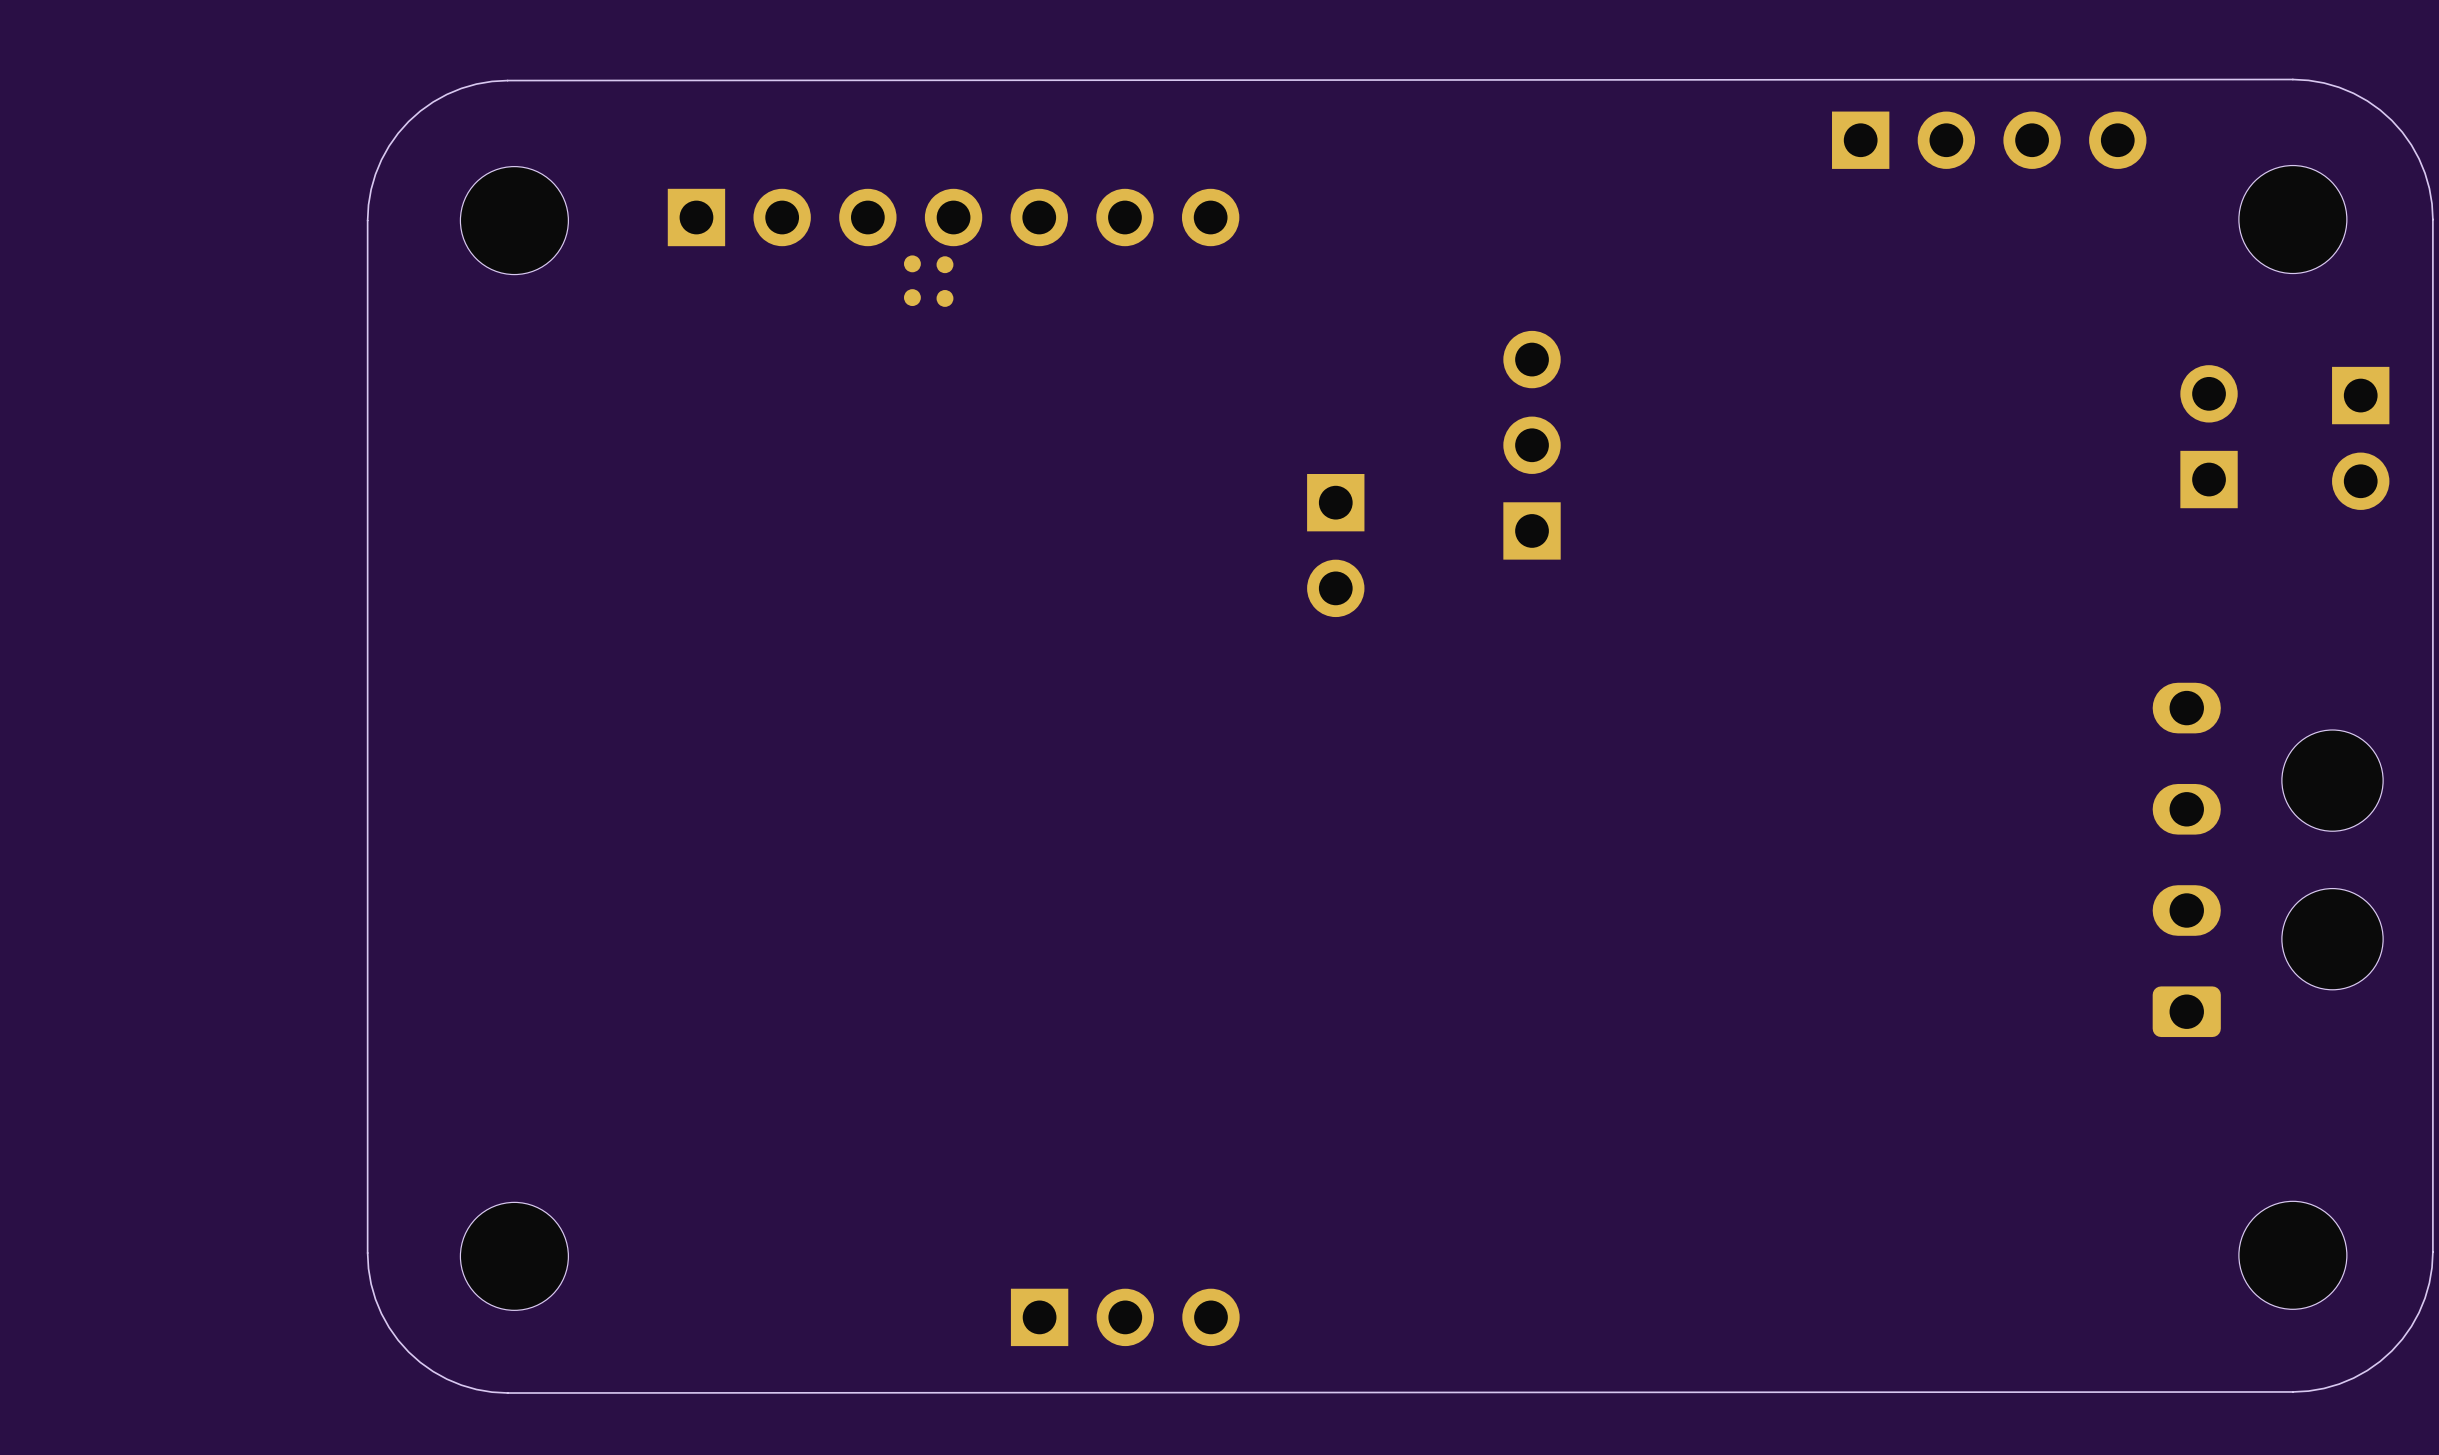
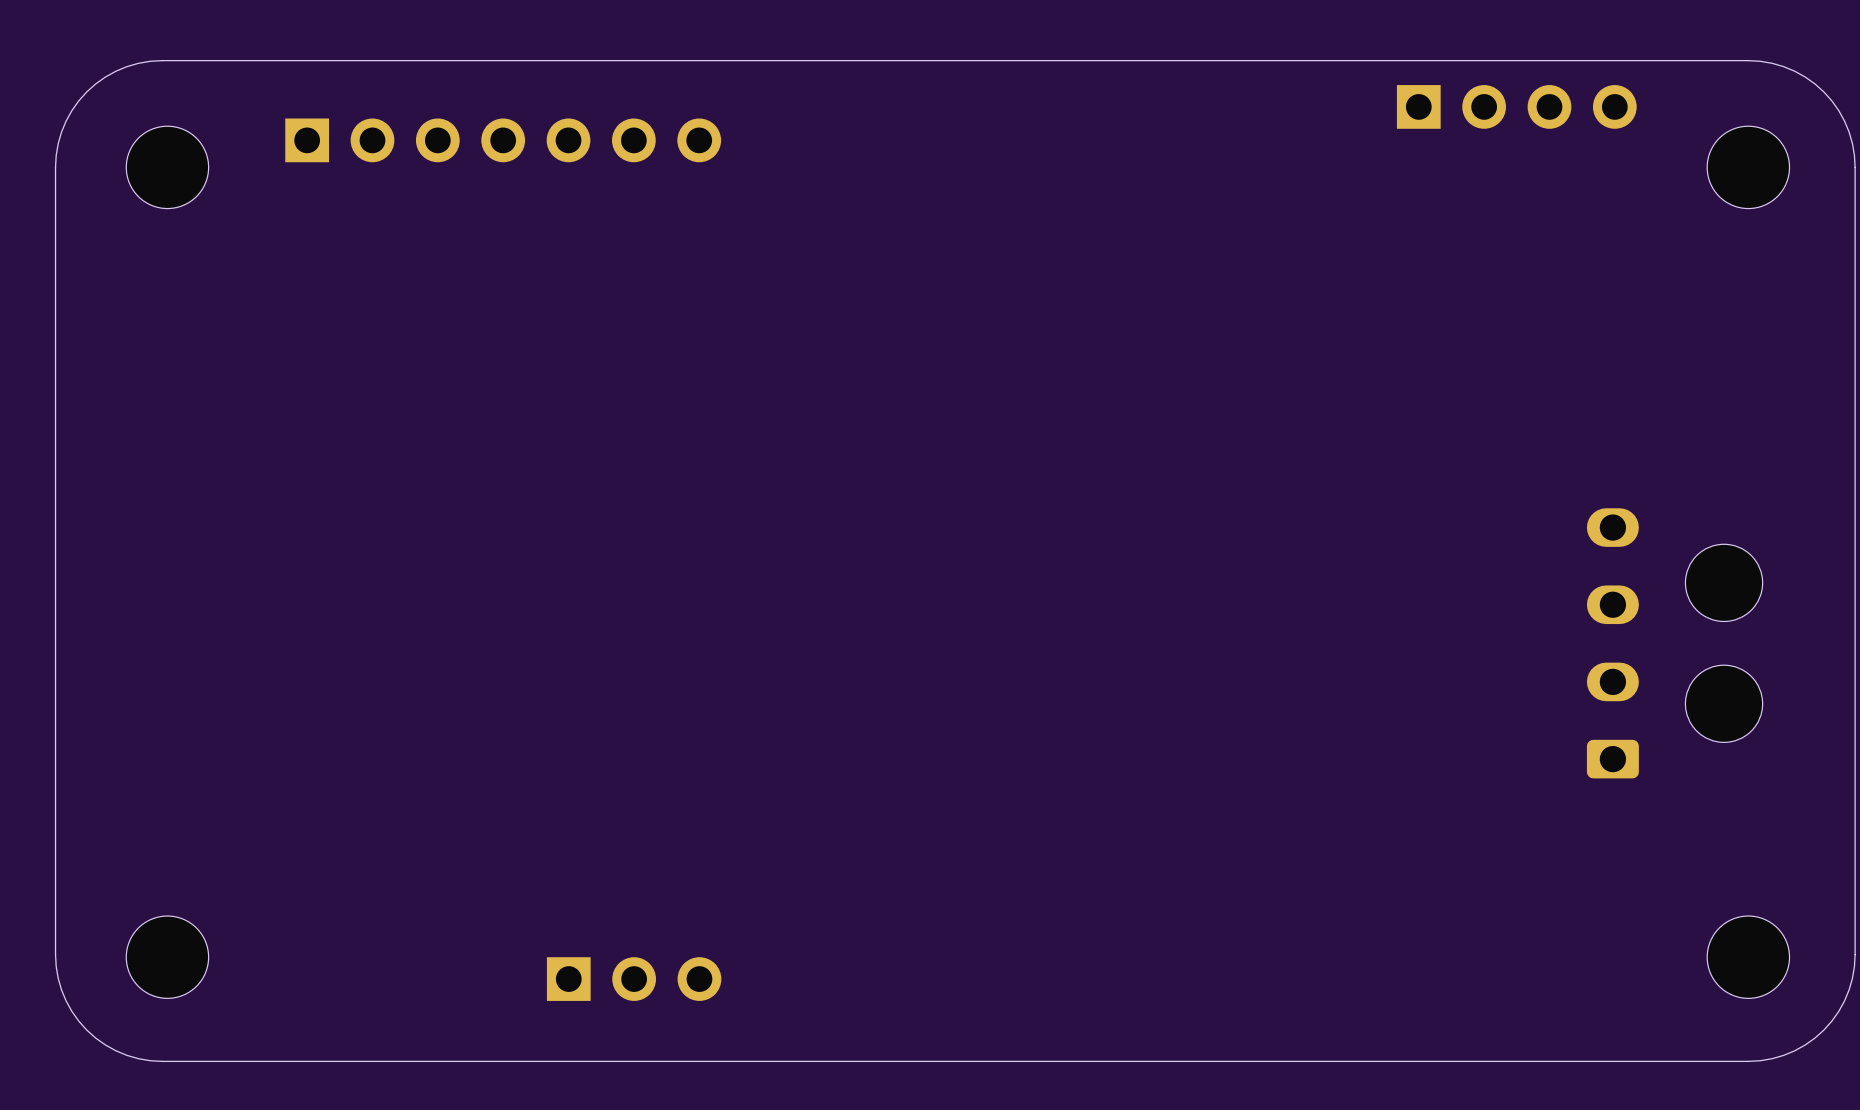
board edge: (2292, 79) (491, 81) (476, 84) (446, 94) (420, 111) (408, 121) (398, 133) (381, 159) (371, 189) (367, 220) (368, 1268) (375, 1299) (389, 1327) (408, 1352) (433, 1371) (461, 1385) (476, 1389) (507, 1393) (2292, 1391) -> (1748, 60) (150, 61) (127, 66) (105, 76) (78, 100) (61, 132) (55, 167) (56, 966) (61, 989) (78, 1021) (95, 1038) (115, 1050) (138, 1058) (162, 1061) (1748, 1061)
part position: (953, 217) -> (503, 140)
part position: (514, 220) -> (167, 167)
part: (912, 280) -> none
part: (944, 281) -> none
part: (2209, 436) -> none
part: (2360, 438) -> none
part: (1532, 445) -> none
part: (1335, 545) -> none
part position: (2267, 859) -> (1674, 643)
part position: (514, 1256) -> (167, 957)
part position: (1125, 1317) -> (634, 979)

